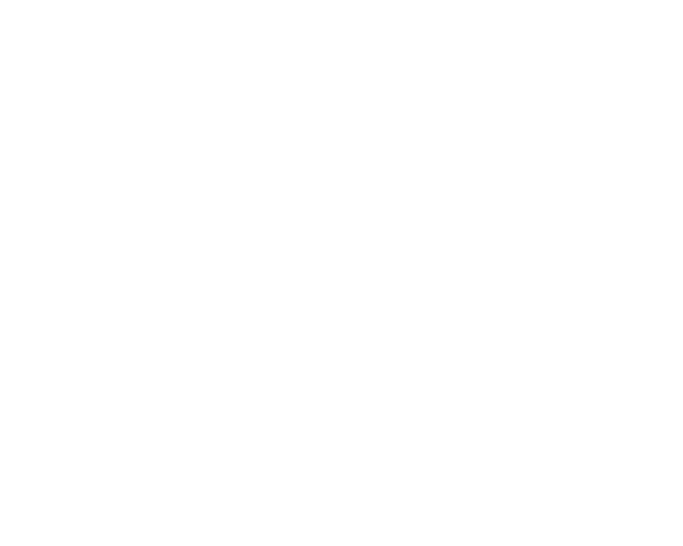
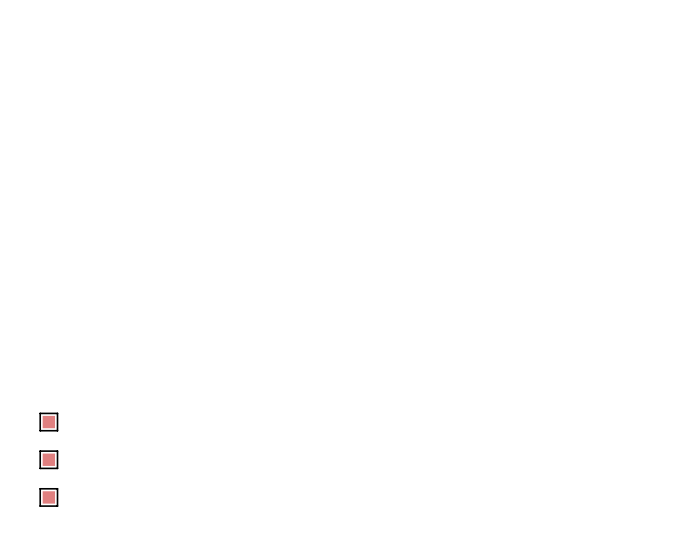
part: none -> (48, 422)
part: none -> (48, 459)
part: none -> (48, 497)

